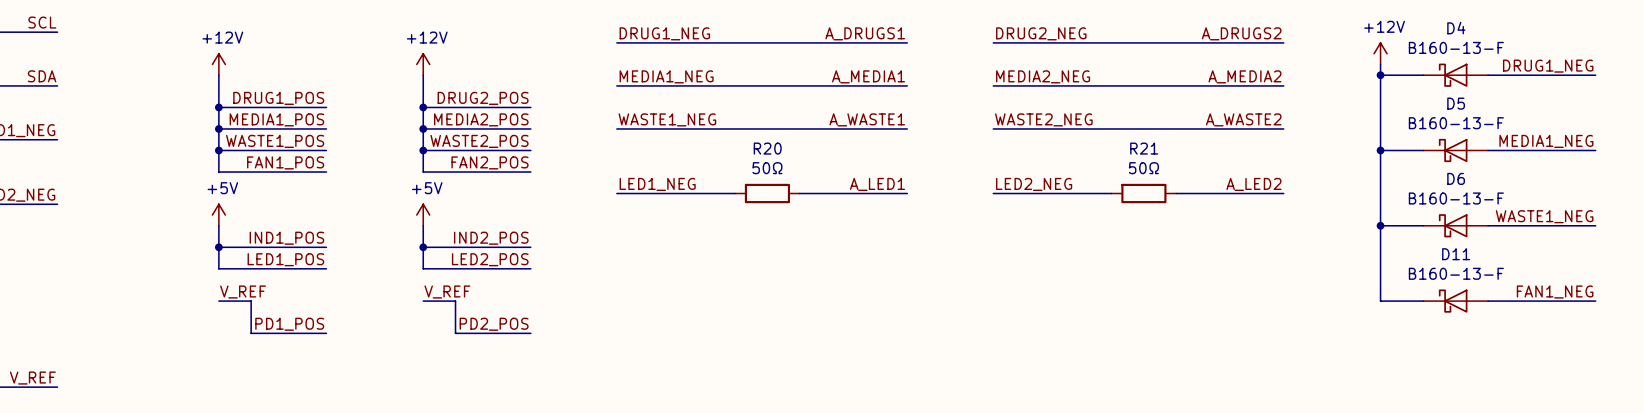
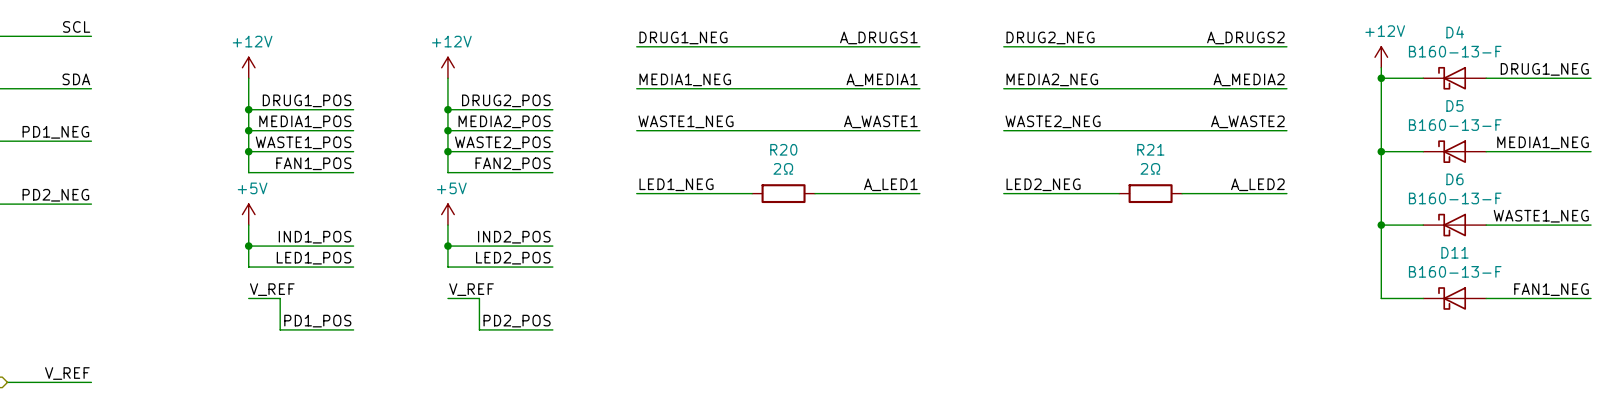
R20 value: 50Ω (767, 168) -> 2Ω (783, 168)
R21 value: 50Ω (1143, 168) -> 2Ω (1150, 168)

